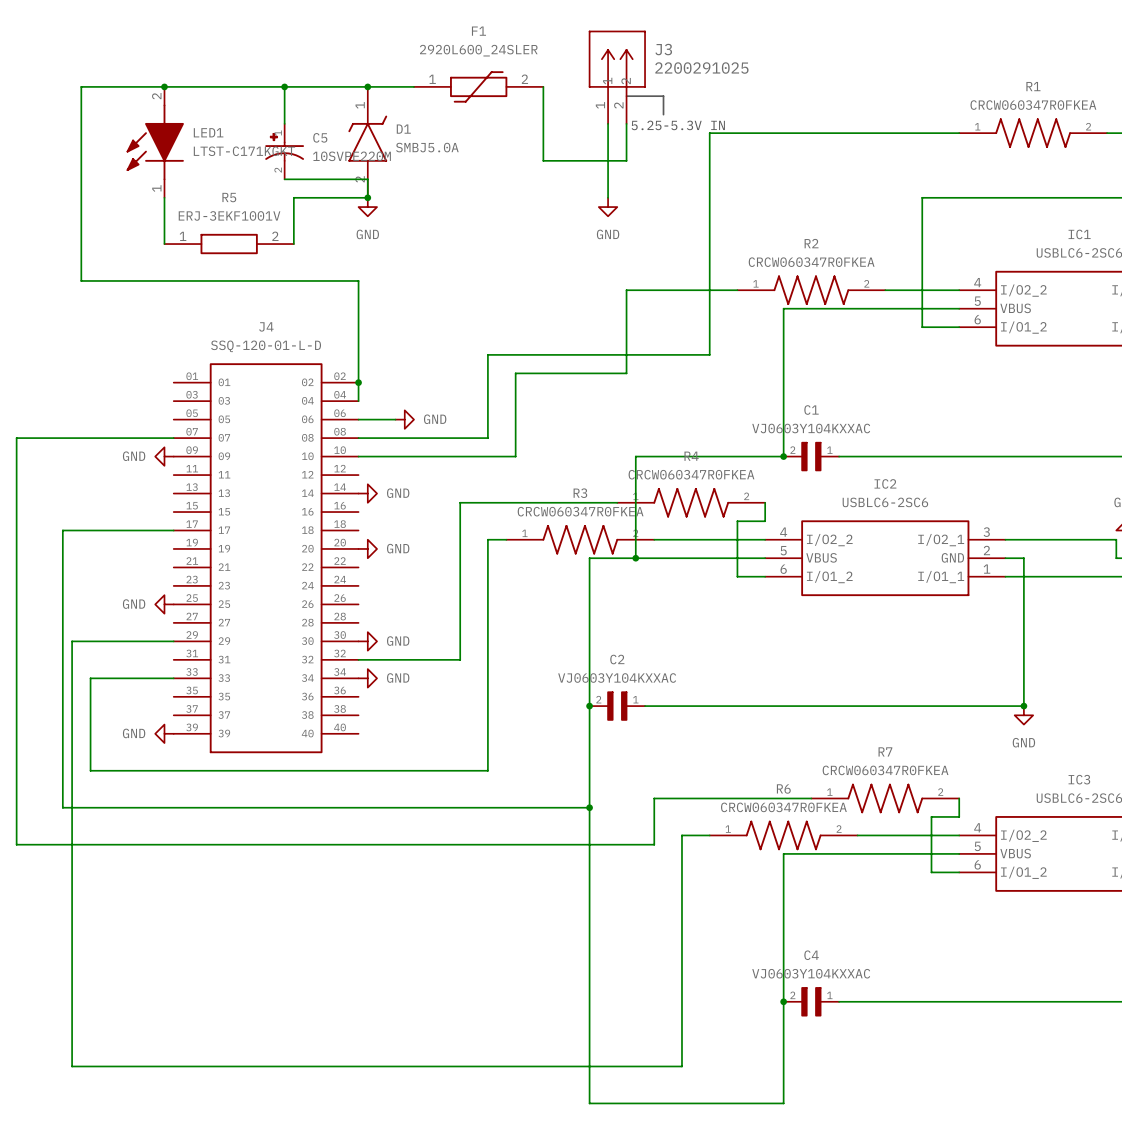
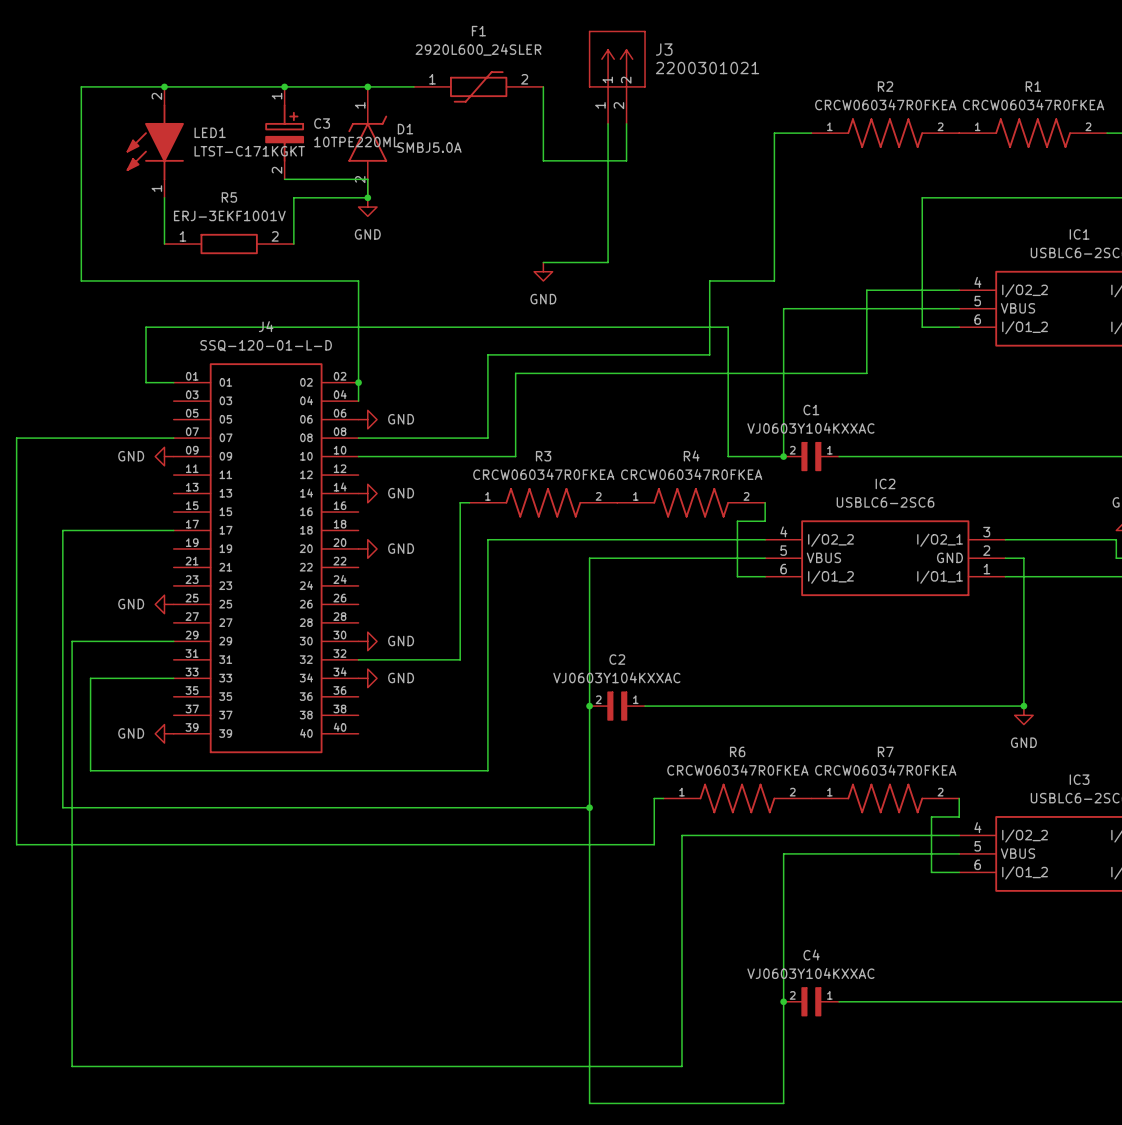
J3 value: 2200291025 (701, 68) -> 2200301021 (707, 68)
line: (626, 96) (663, 96) (663, 114) -> none
text: 5.25-5.3V IN (678, 125) -> none
C3: none -> 10TPE220ML (284, 133)
wire: (774, 133) (709, 133) (709, 280) -> (774, 133) (774, 280) (709, 280)
C5: 10SVPE220M (284, 151) -> none
wire: none -> (608, 197) (608, 262) (543, 262)
power symbol position: GND (608, 207) -> GND (543, 271)
wire: (737, 290) (626, 290) (626, 373) -> (885, 290) (866, 290) (866, 373) (626, 373)
R2 position: (811, 290) -> (885, 133)
wire: (358, 419) (395, 419) -> none
power symbol position: GND (404, 419) -> GND (367, 419)
wire: (728, 456) (635, 456) (635, 558) -> (728, 456) (728, 327) (146, 327) (146, 382) (173, 382)
R3 position: (580, 539) -> (543, 502)
junction: (635, 558) -> none
R6 position: (783, 835) -> (737, 798)

